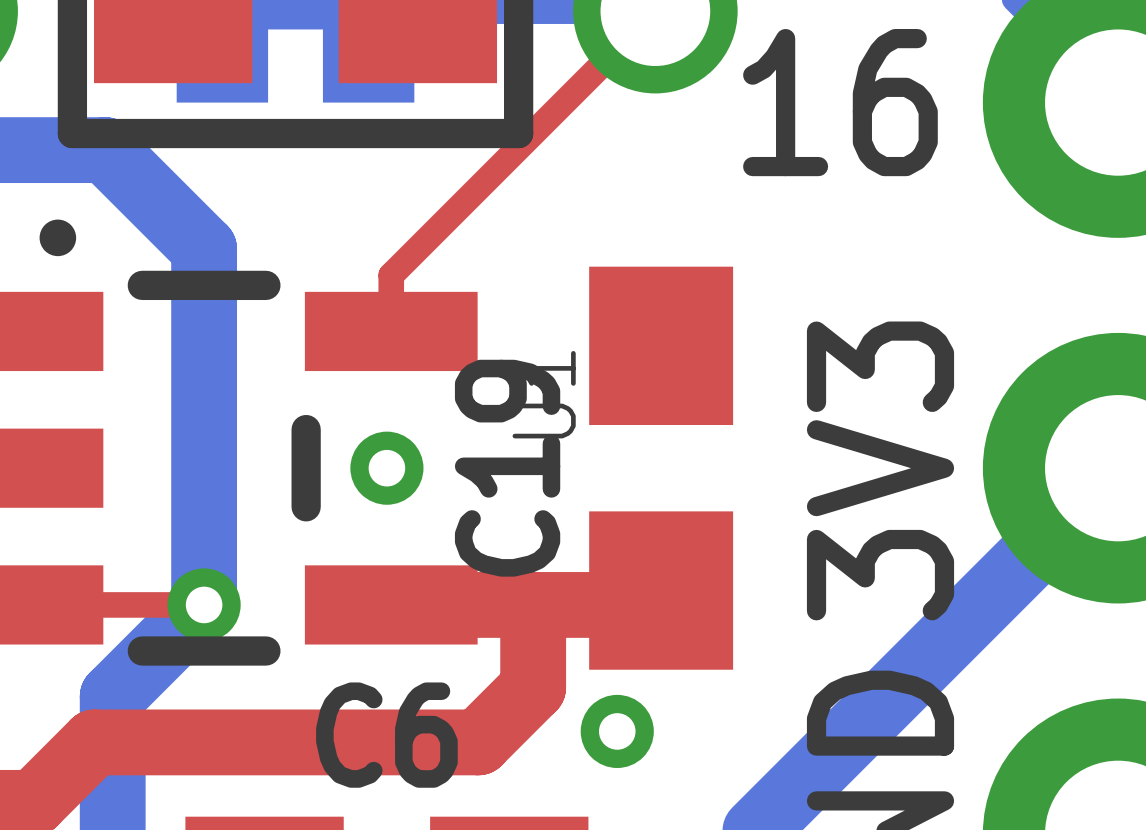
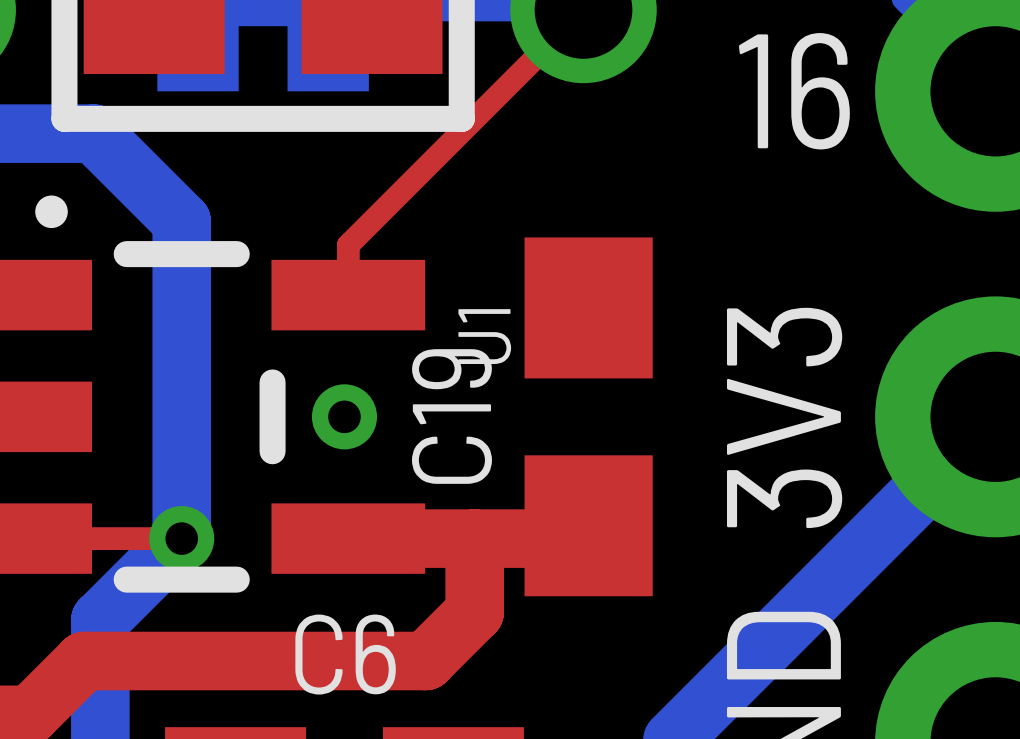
via: (617, 731) -> none

